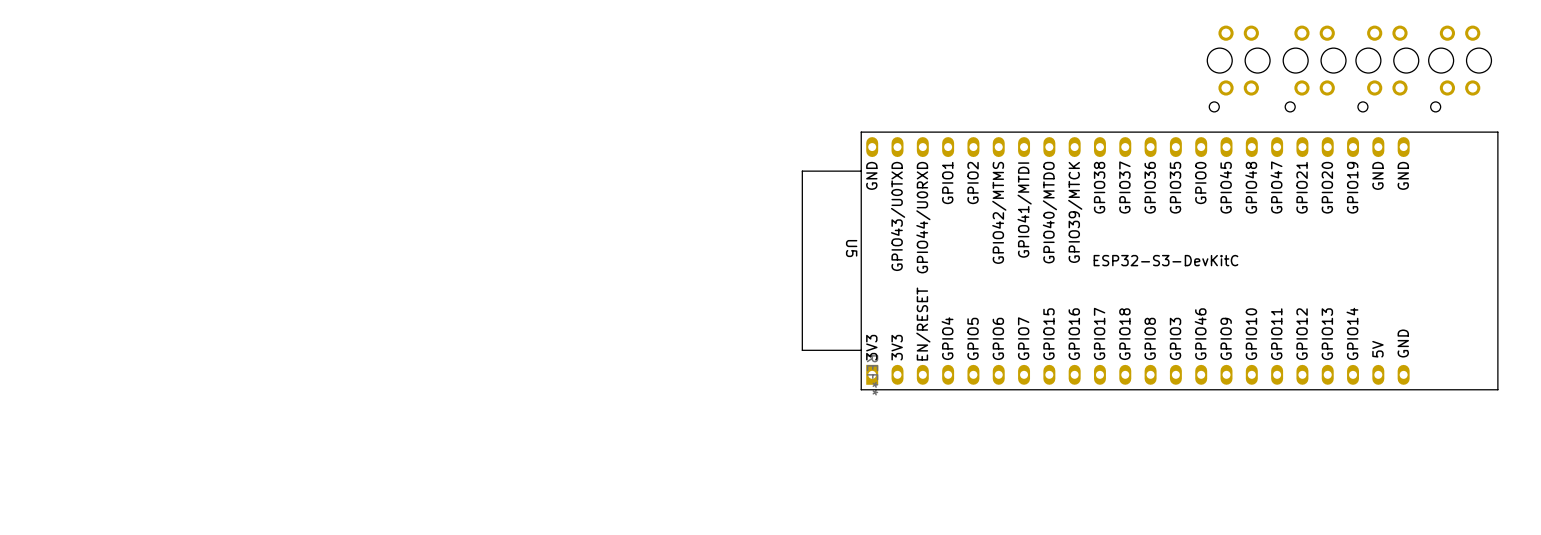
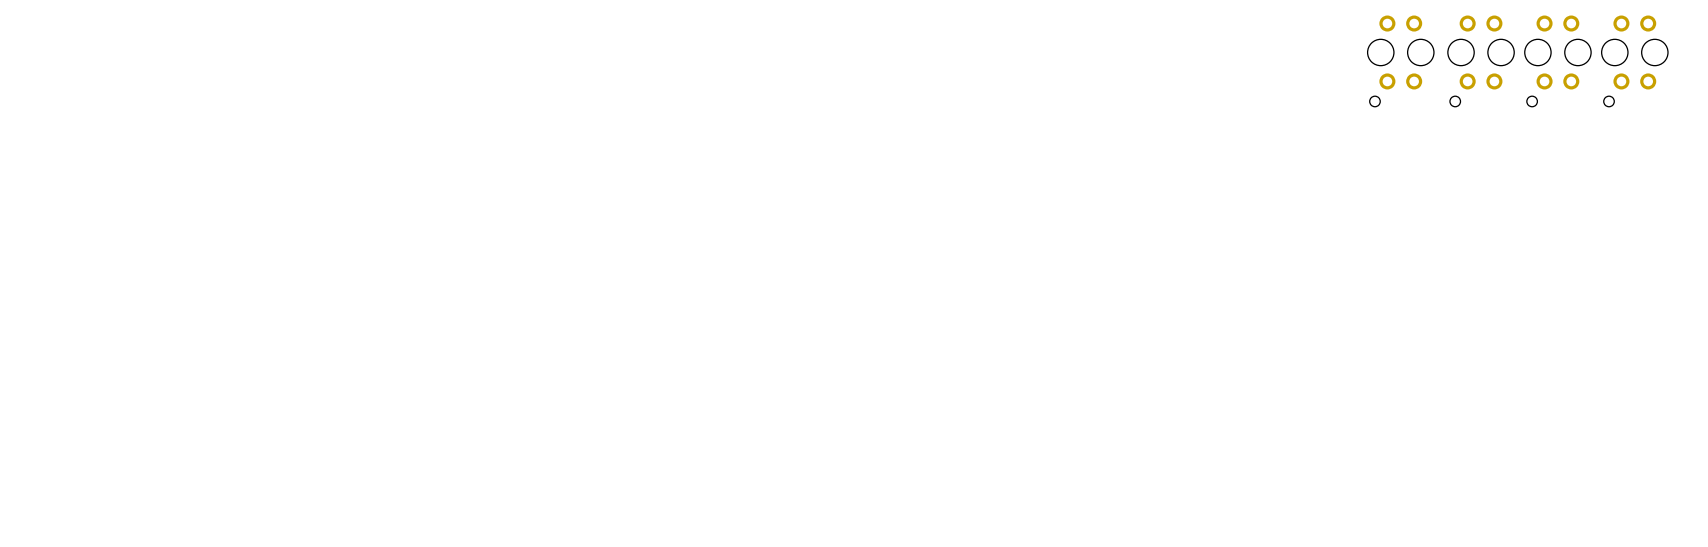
U5: ESP32-S3-DevKitC (1150, 260) -> none

